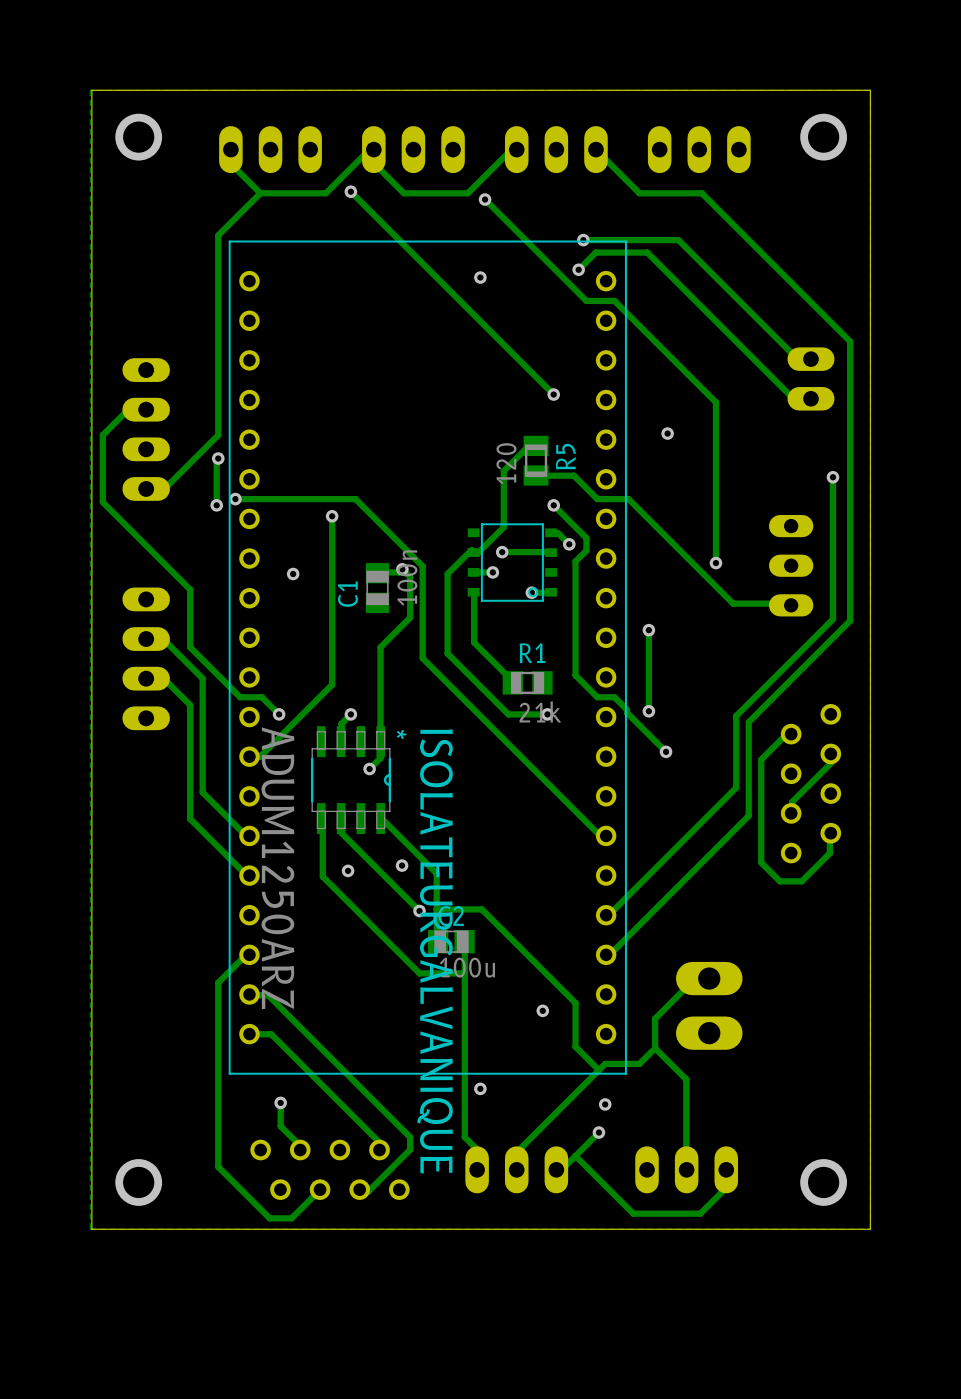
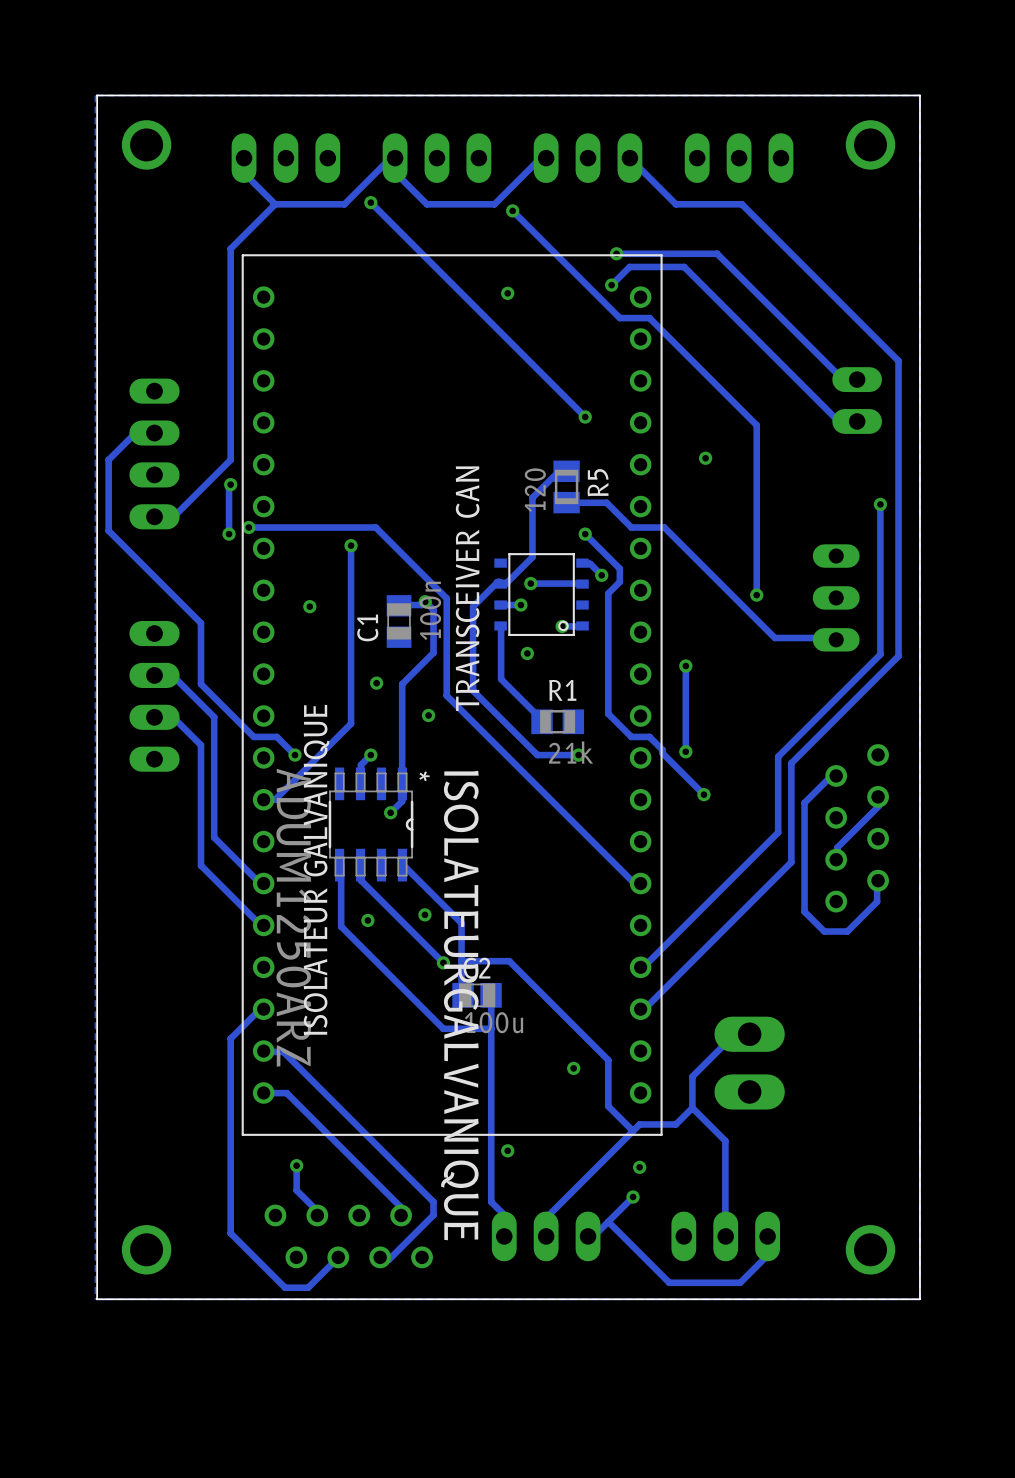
text: none -> TRANSCEIVER CAN (467, 588)
via: none -> (527, 653)
via: none -> (376, 683)
via: none -> (428, 715)
text: none -> ISOLATEUR GALVANIQUE (316, 869)

